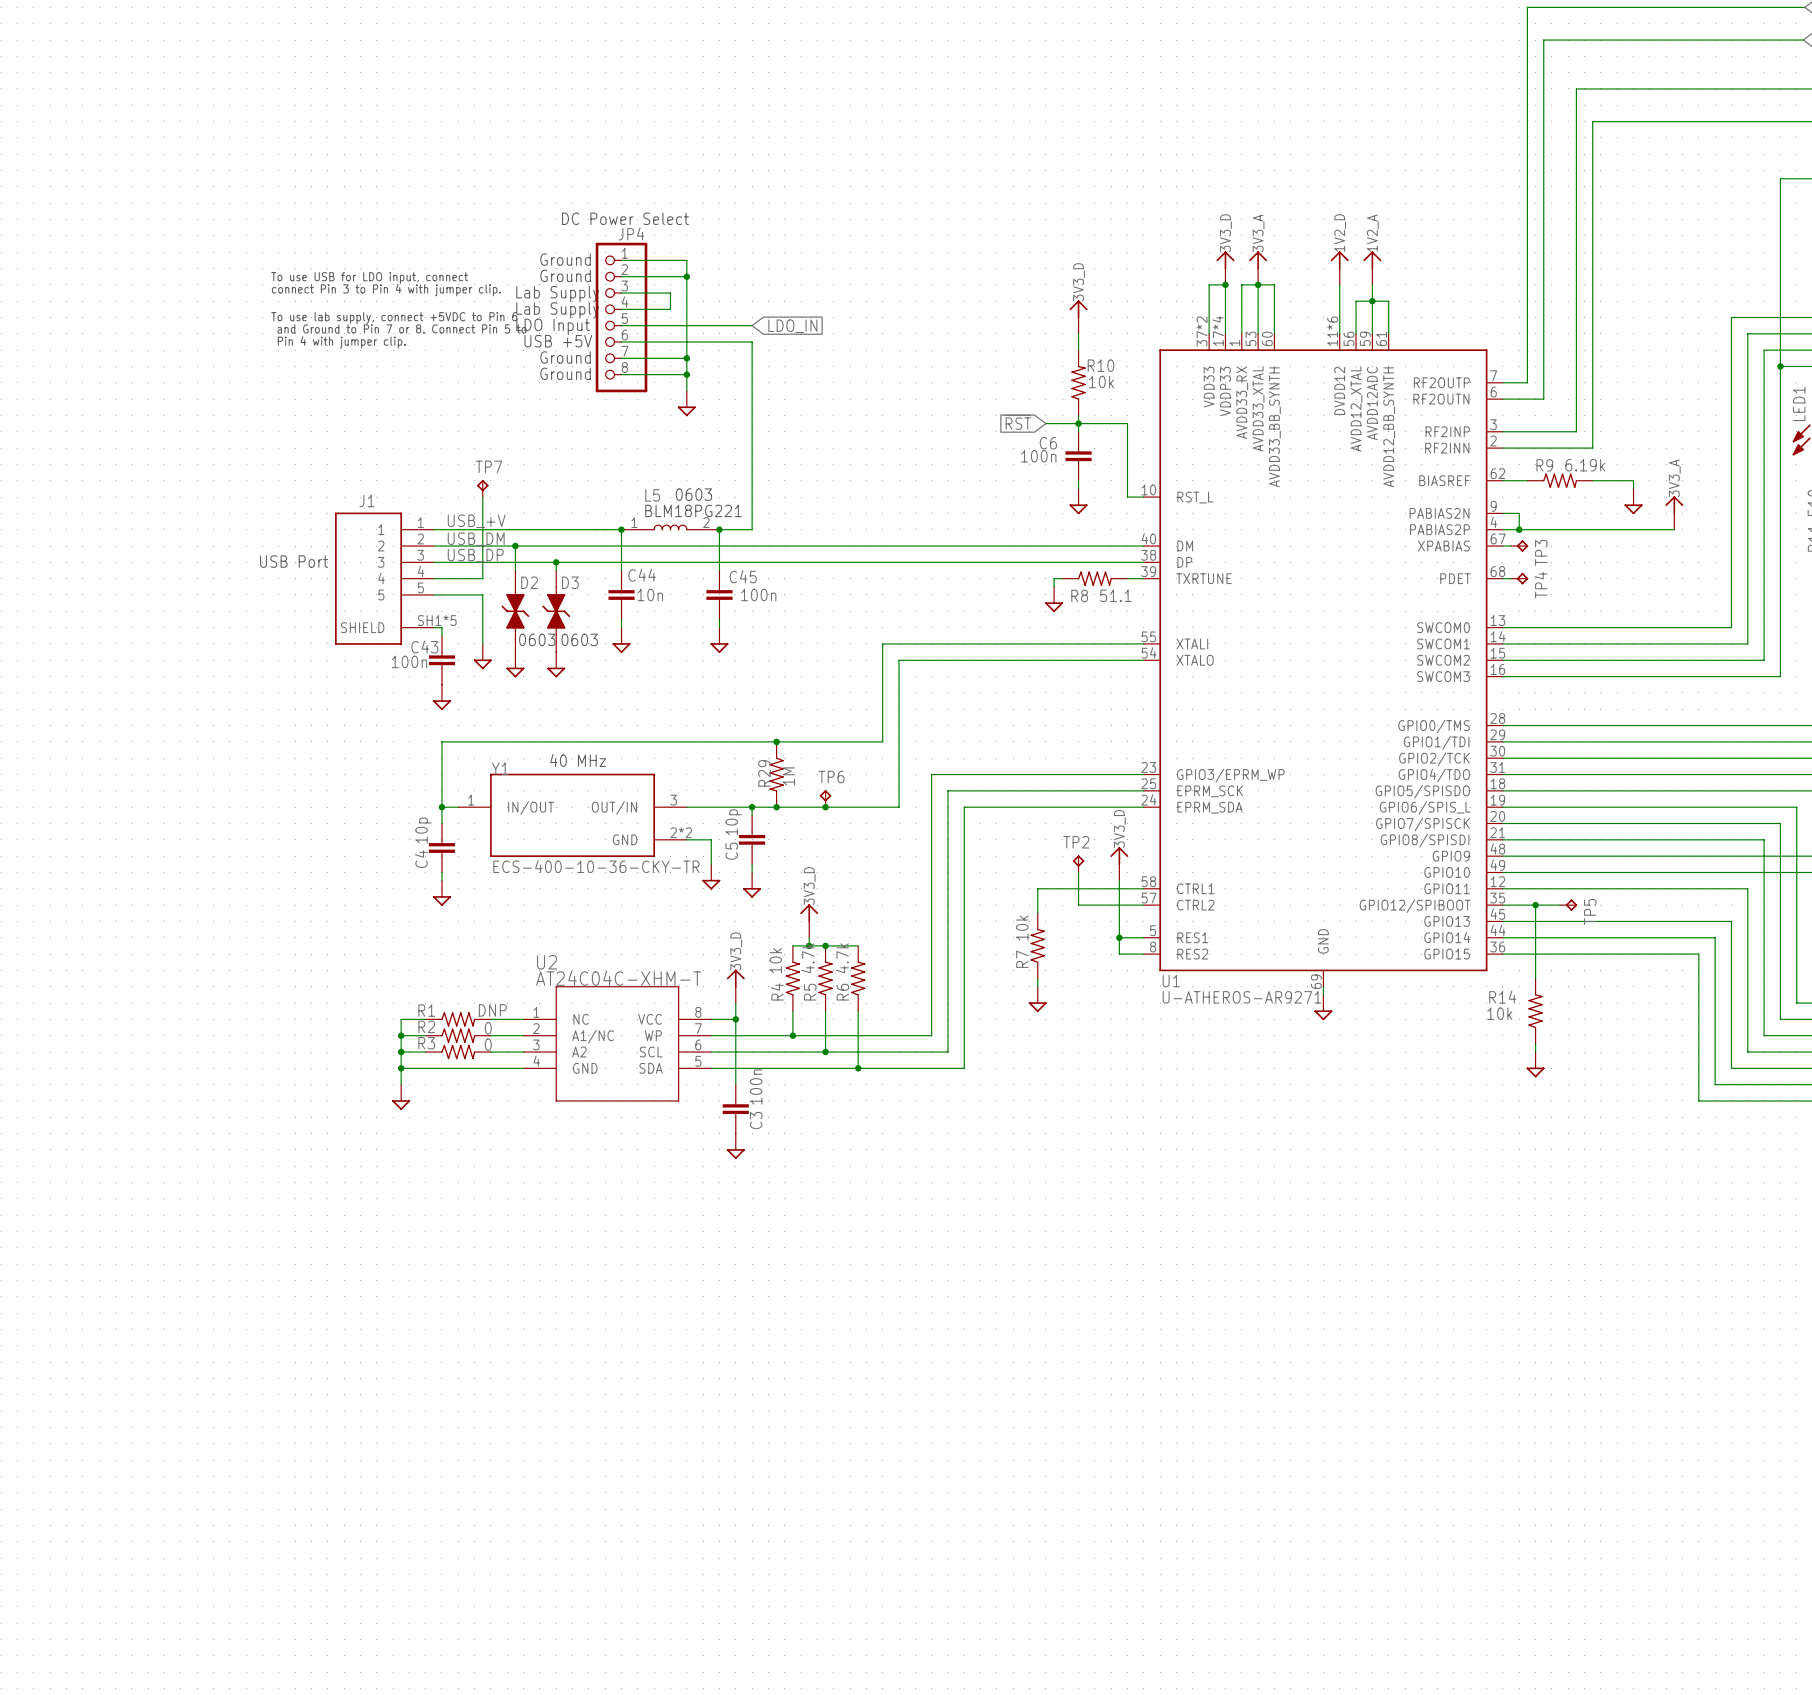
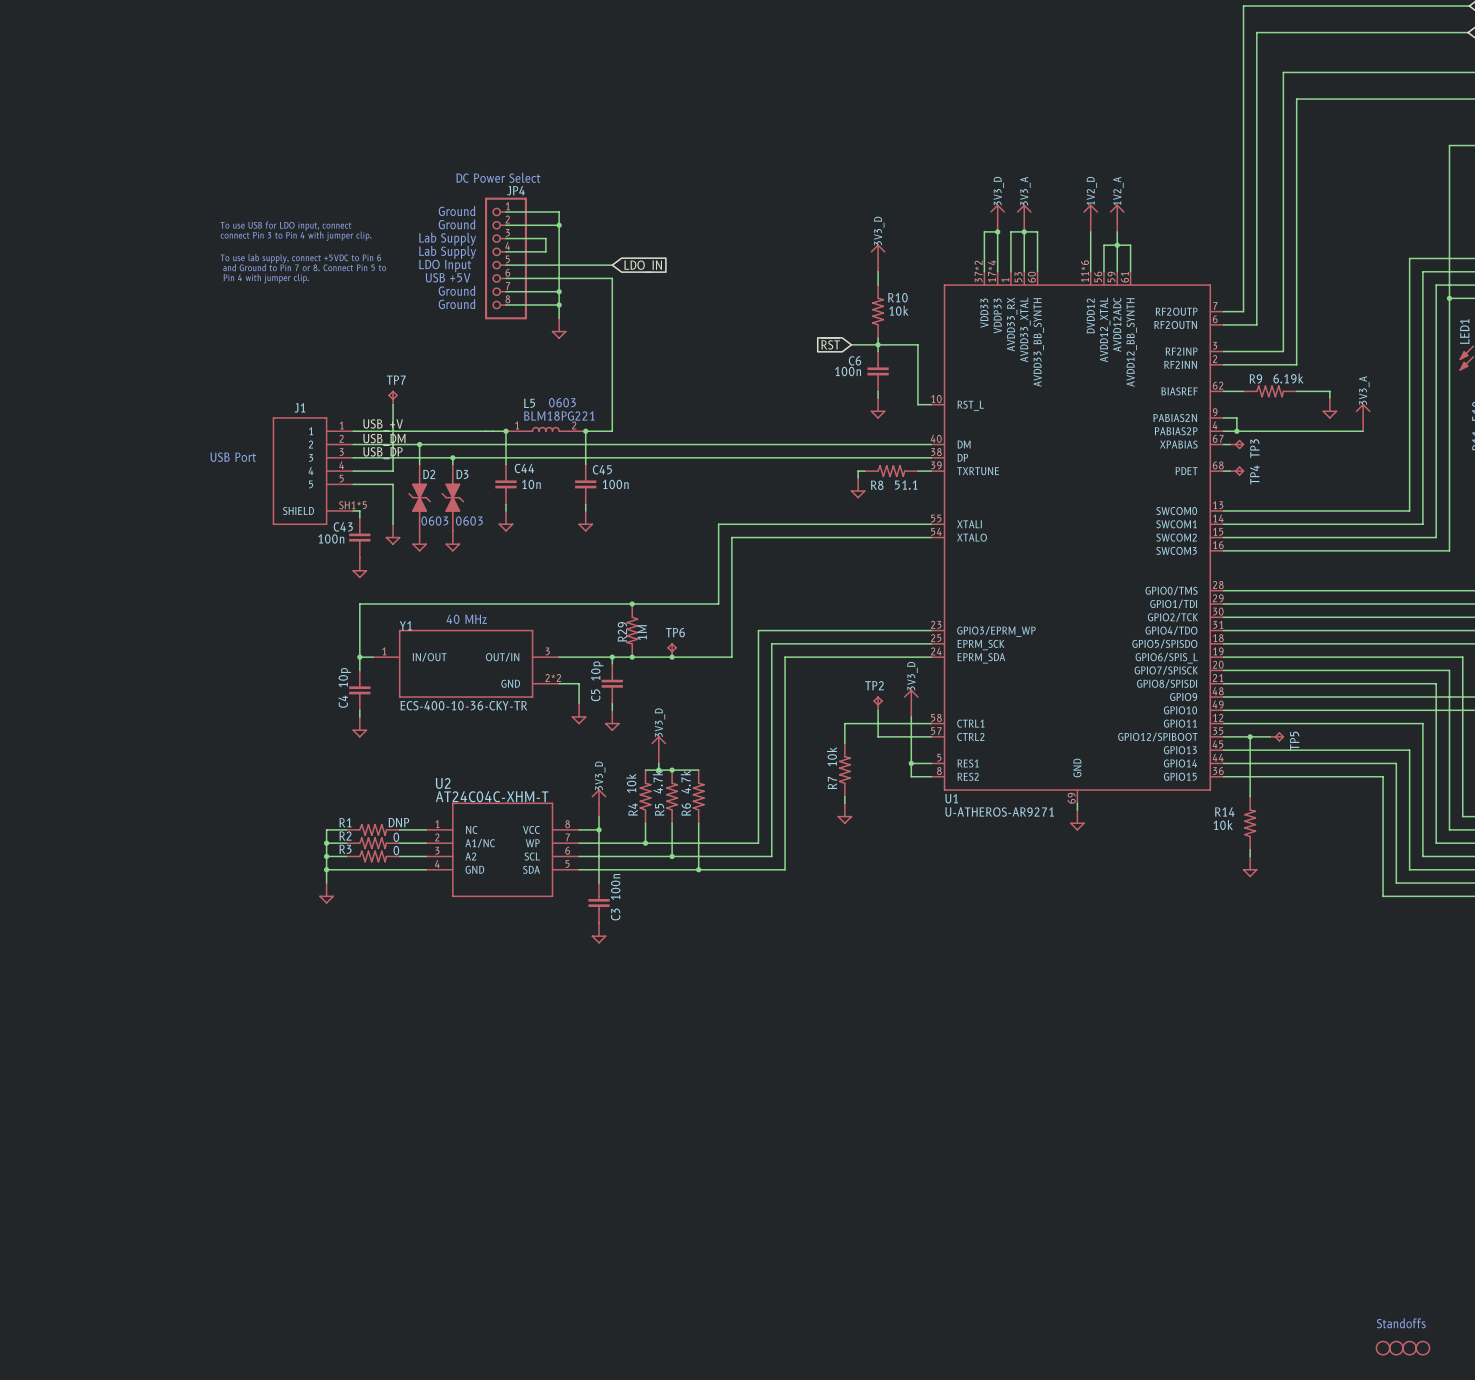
text: none -> Standoffs (1401, 1323)
part: none -> (1383, 1348)
part: none -> (1396, 1348)
part: none -> (1409, 1348)
part: none -> (1422, 1348)

